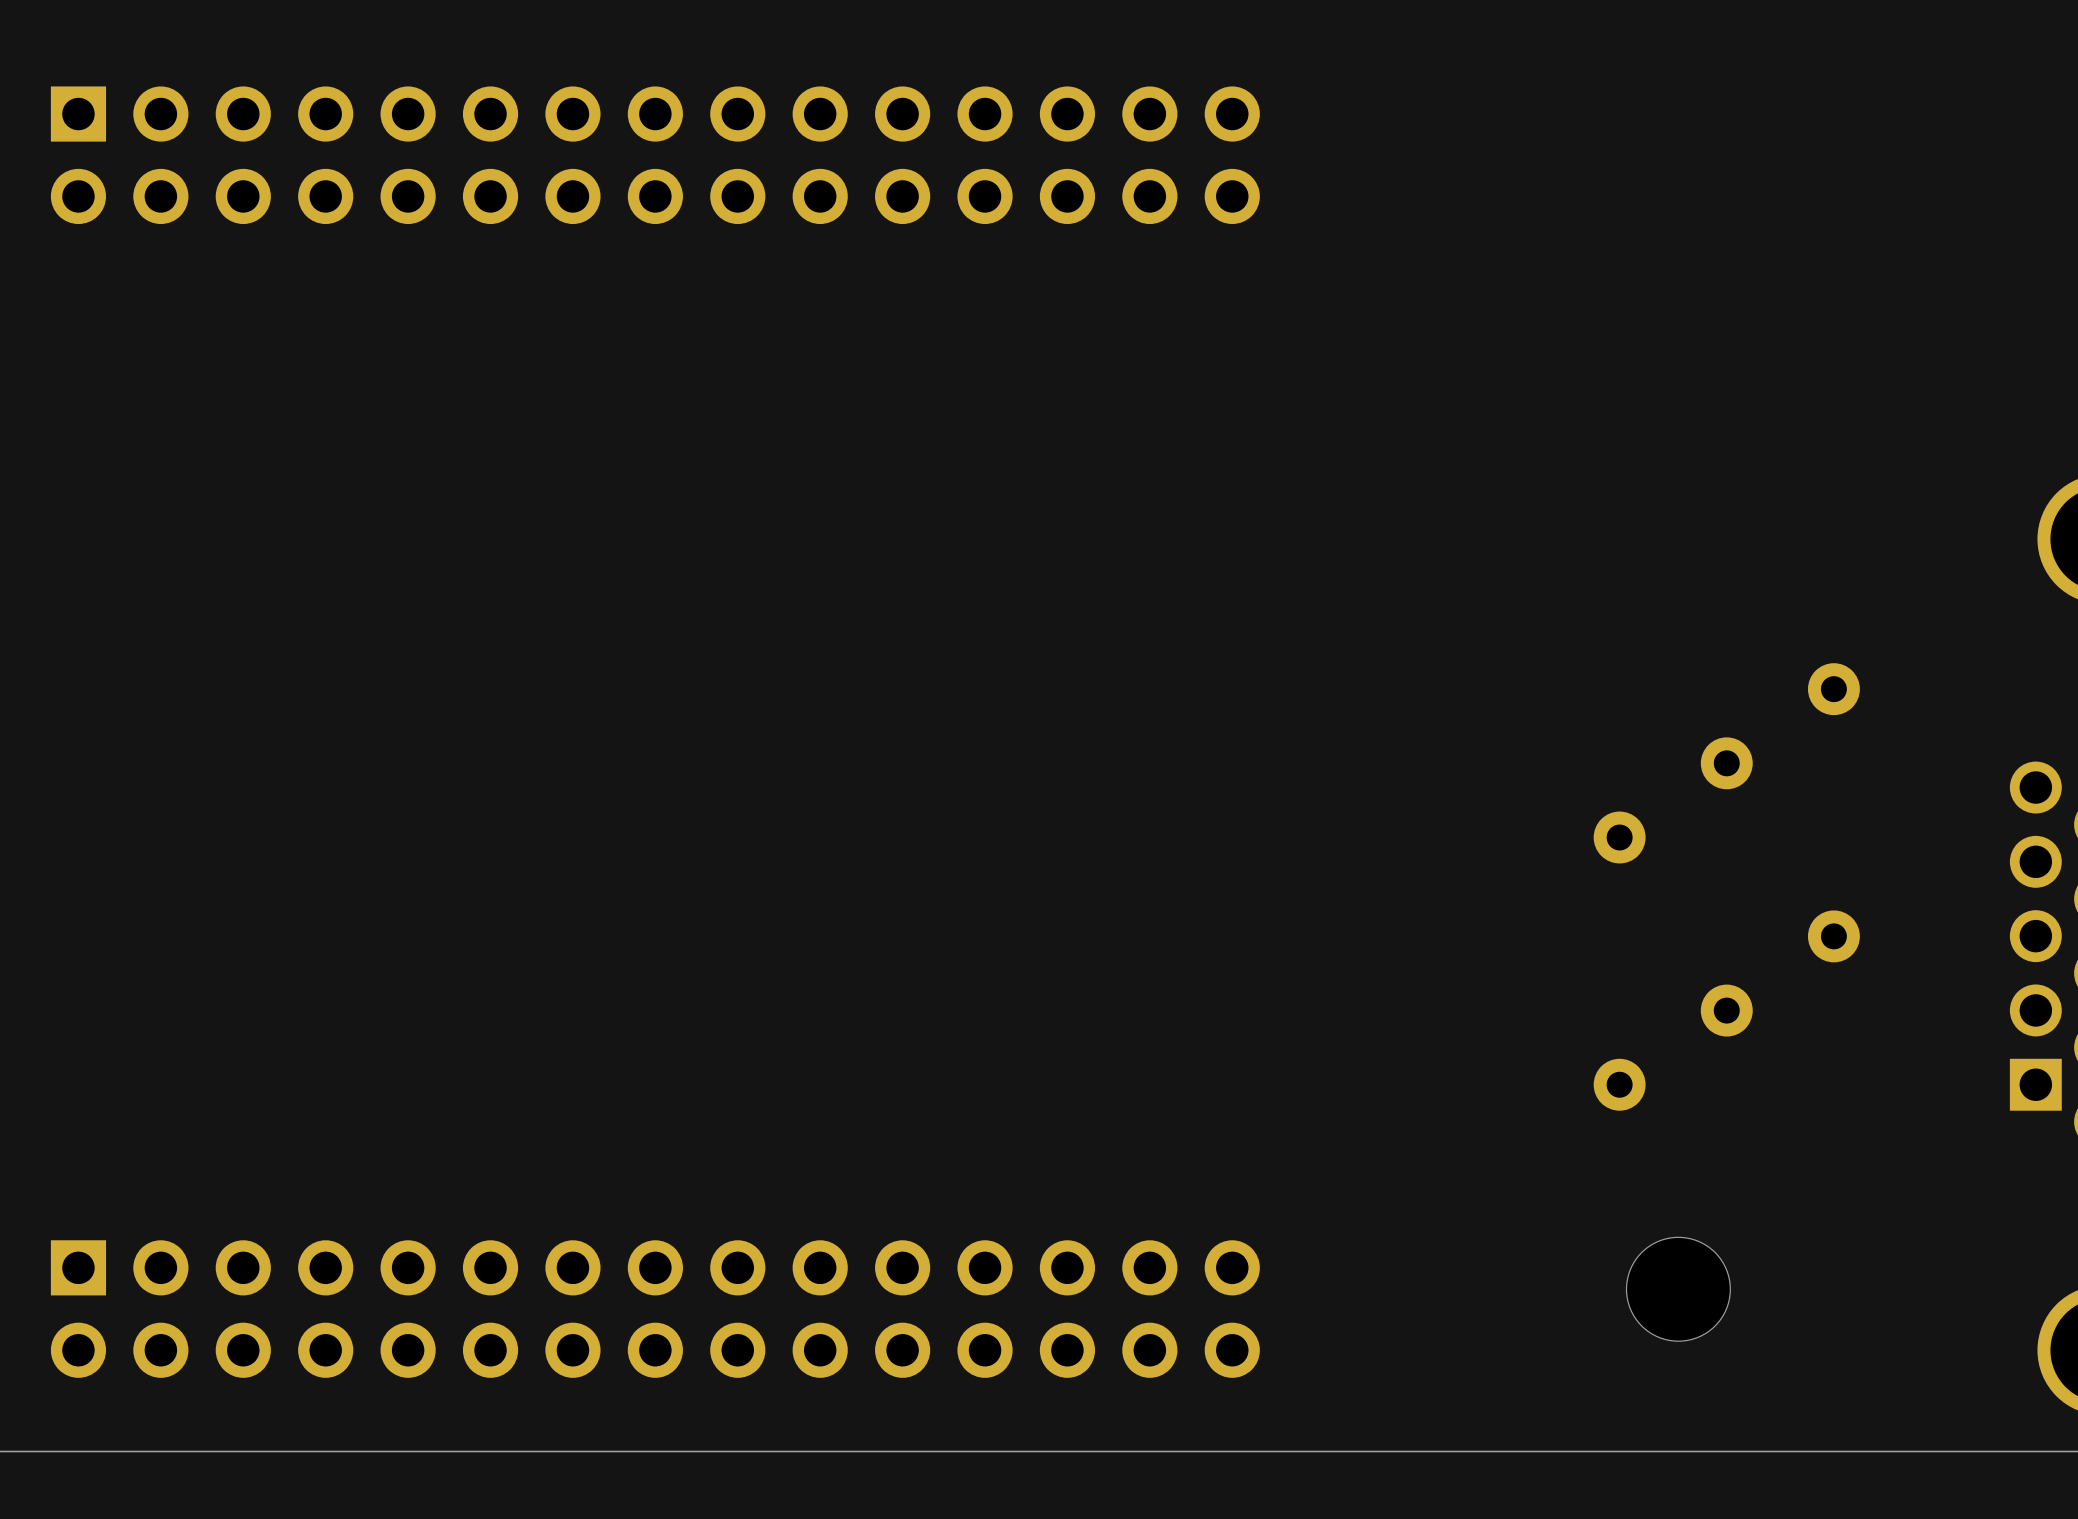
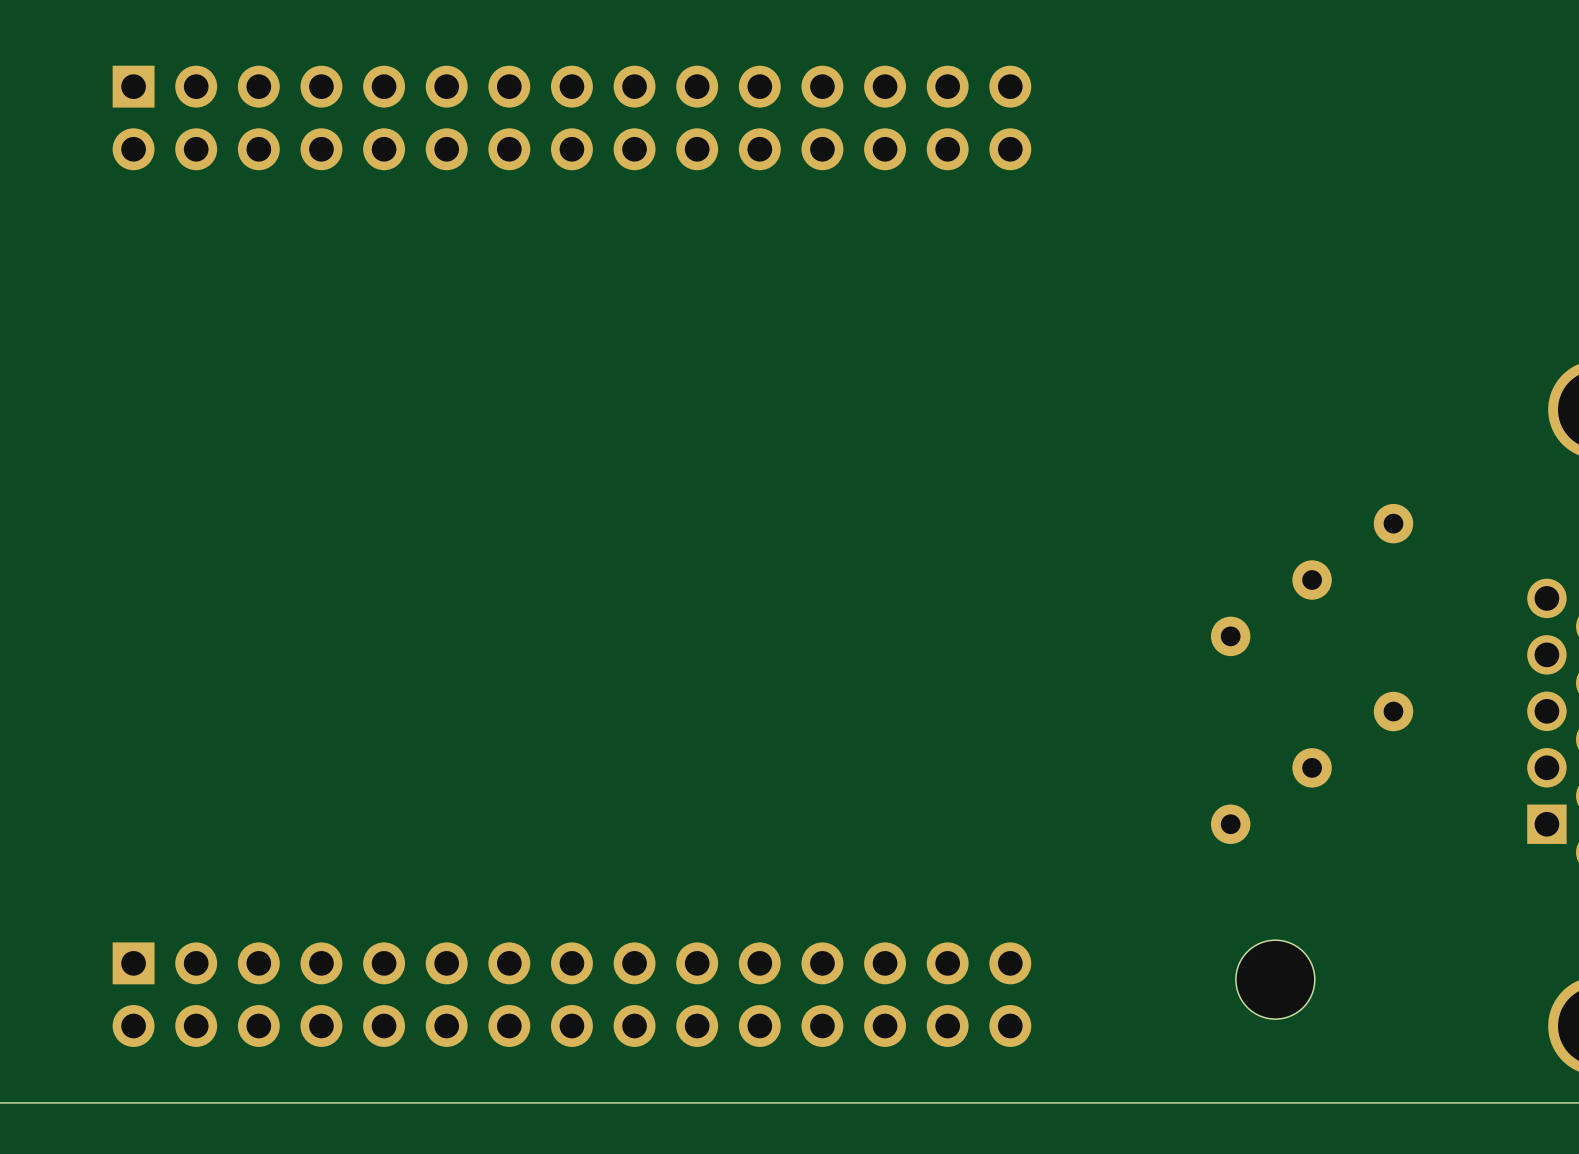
part position: (655, 155) -> (571, 117)
part position: (655, 1309) -> (571, 994)

